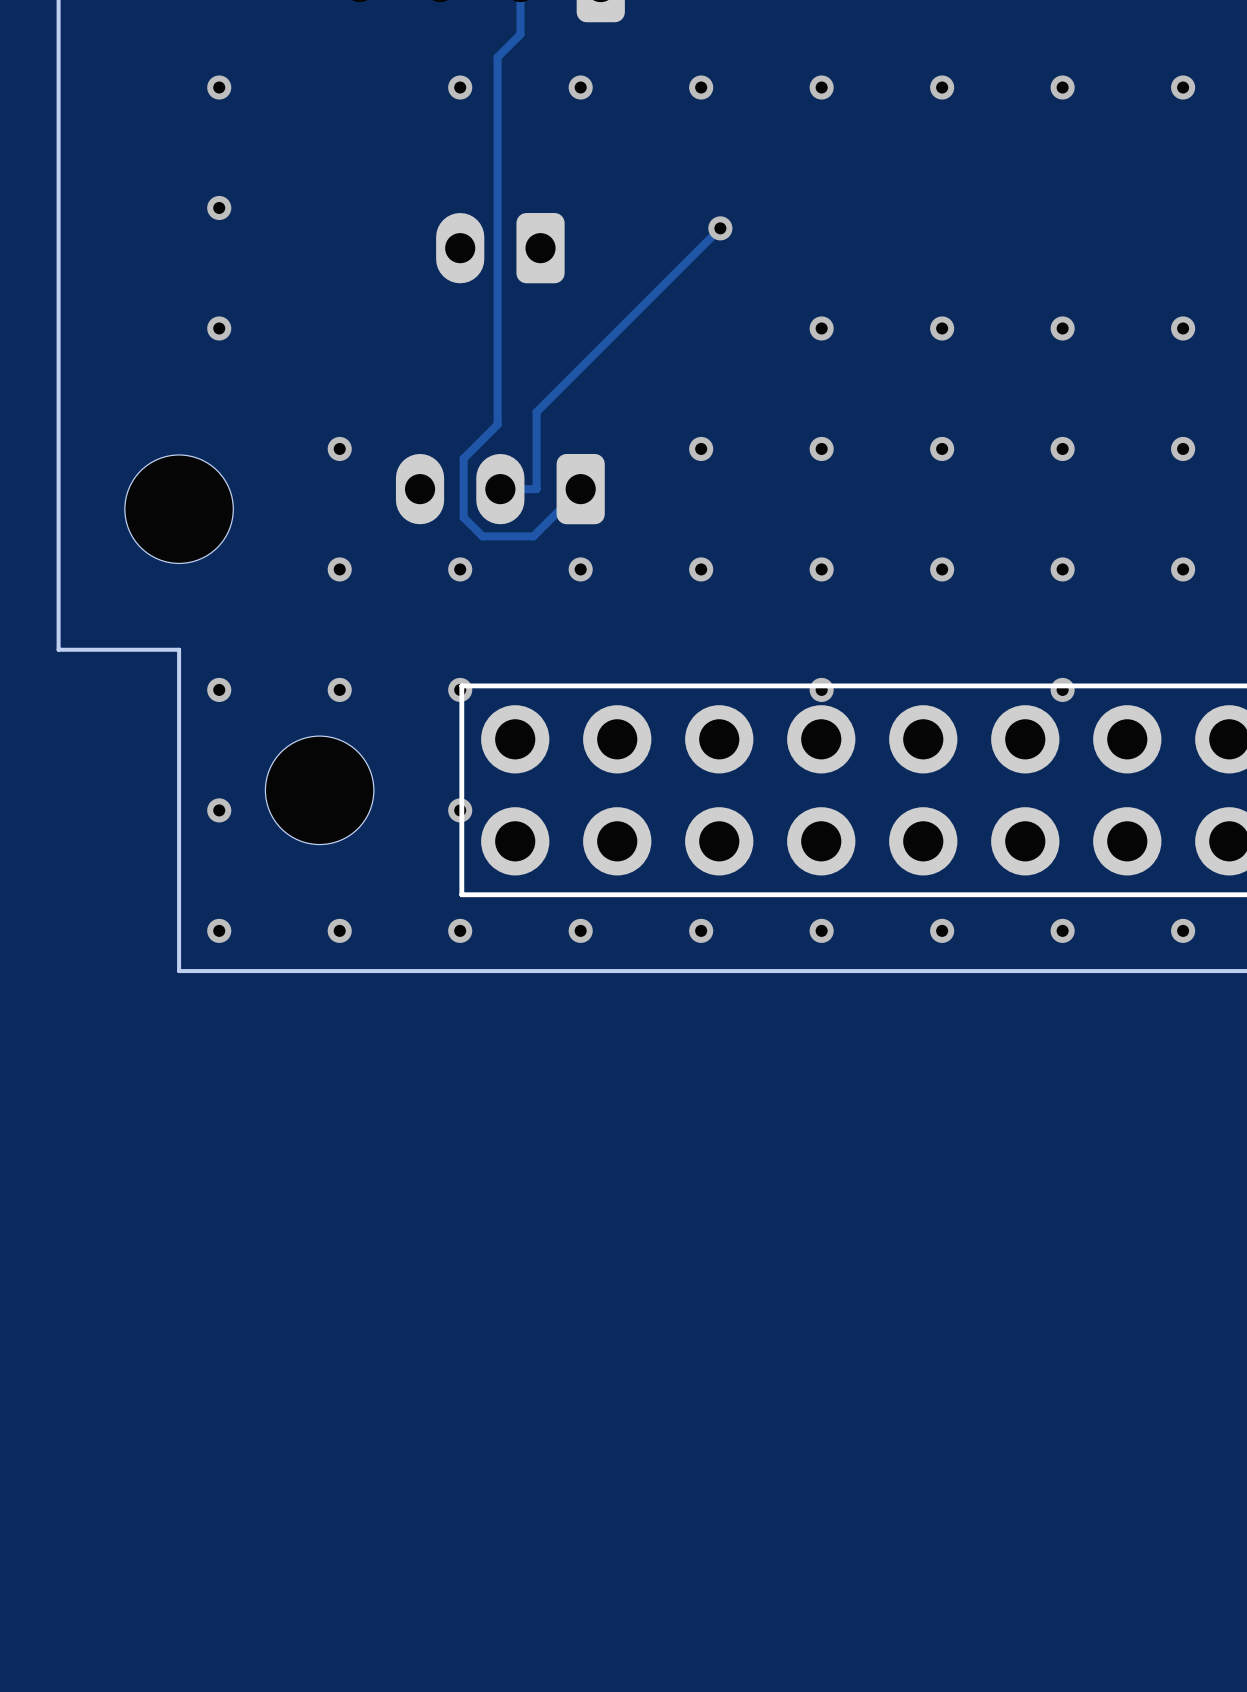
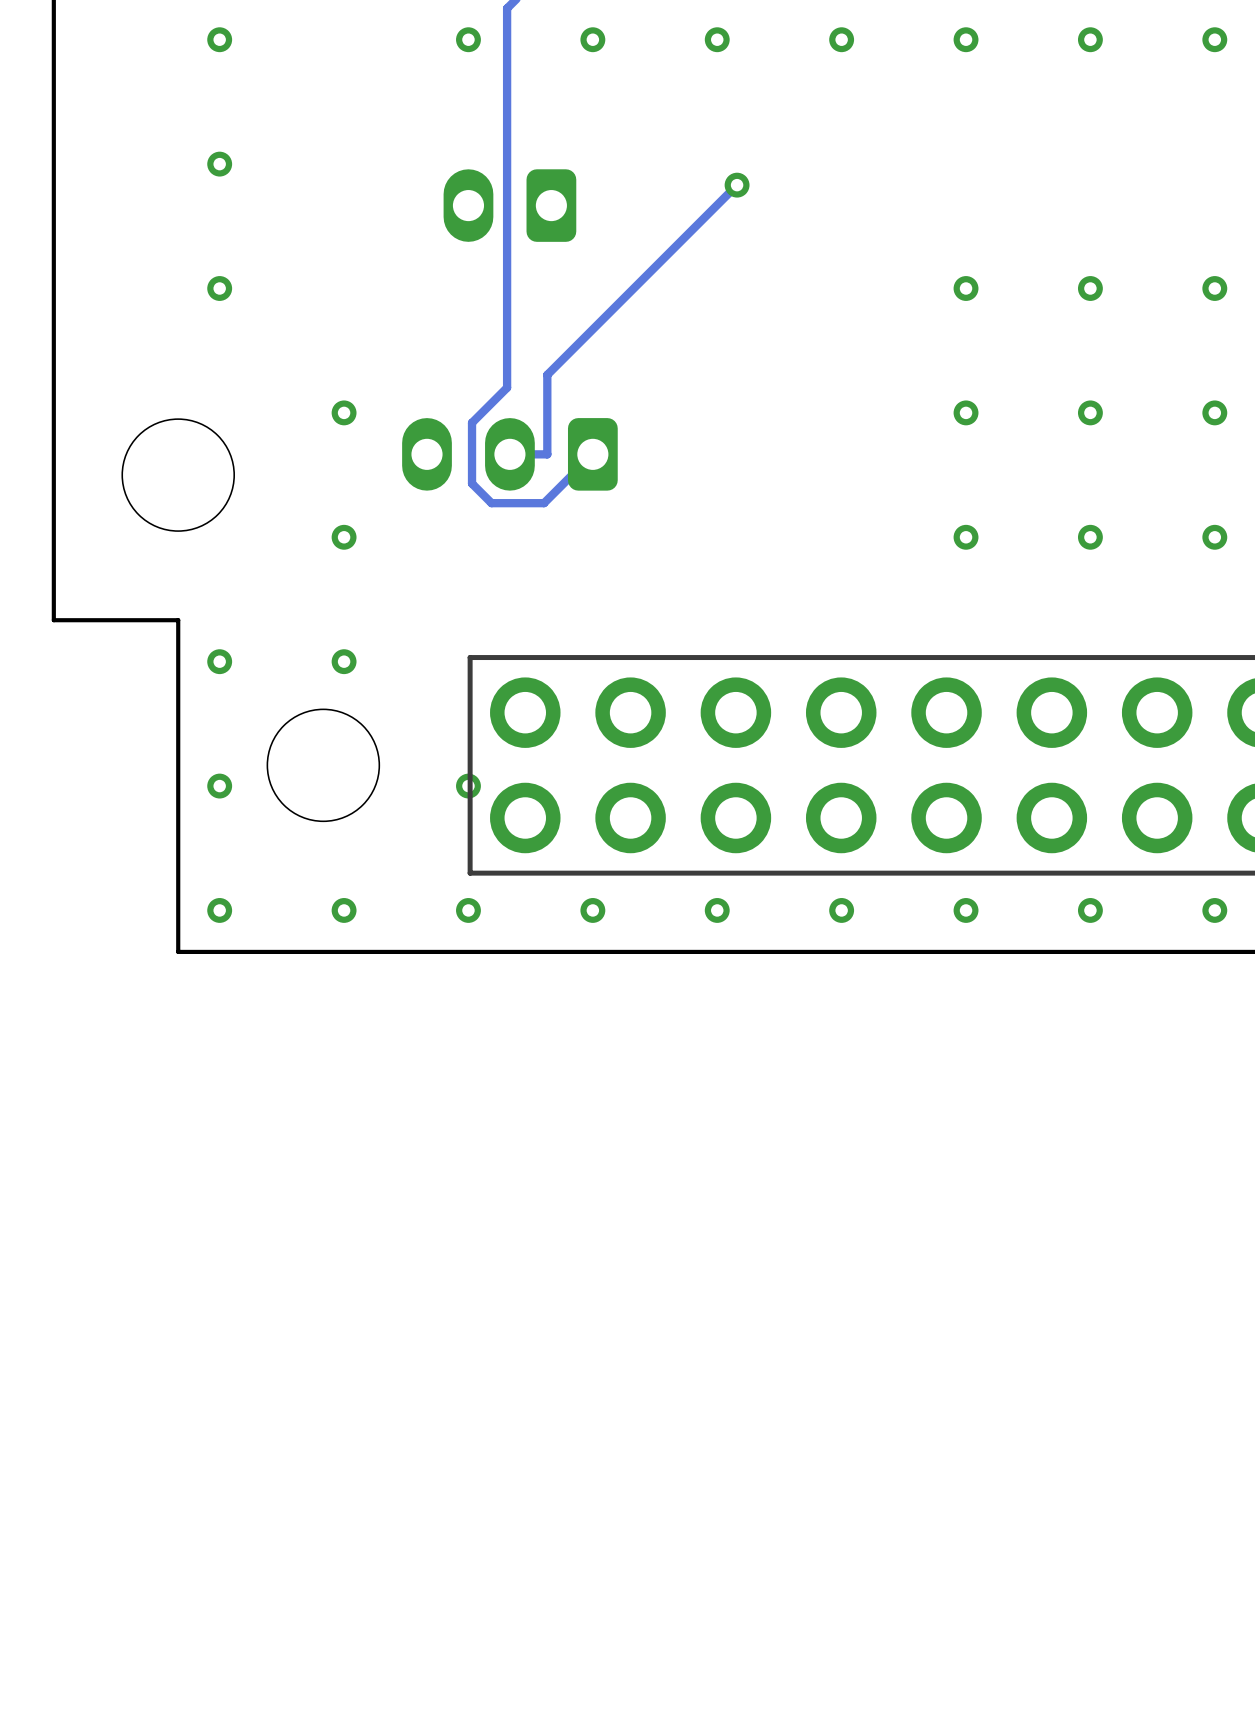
via: (821, 328) -> none
via: (701, 448) -> none
via: (821, 448) -> none
via: (460, 569) -> none
via: (580, 569) -> none
via: (701, 569) -> none
via: (821, 569) -> none
via: (460, 689) -> none
via: (821, 689) -> none
via: (1062, 689) -> none

